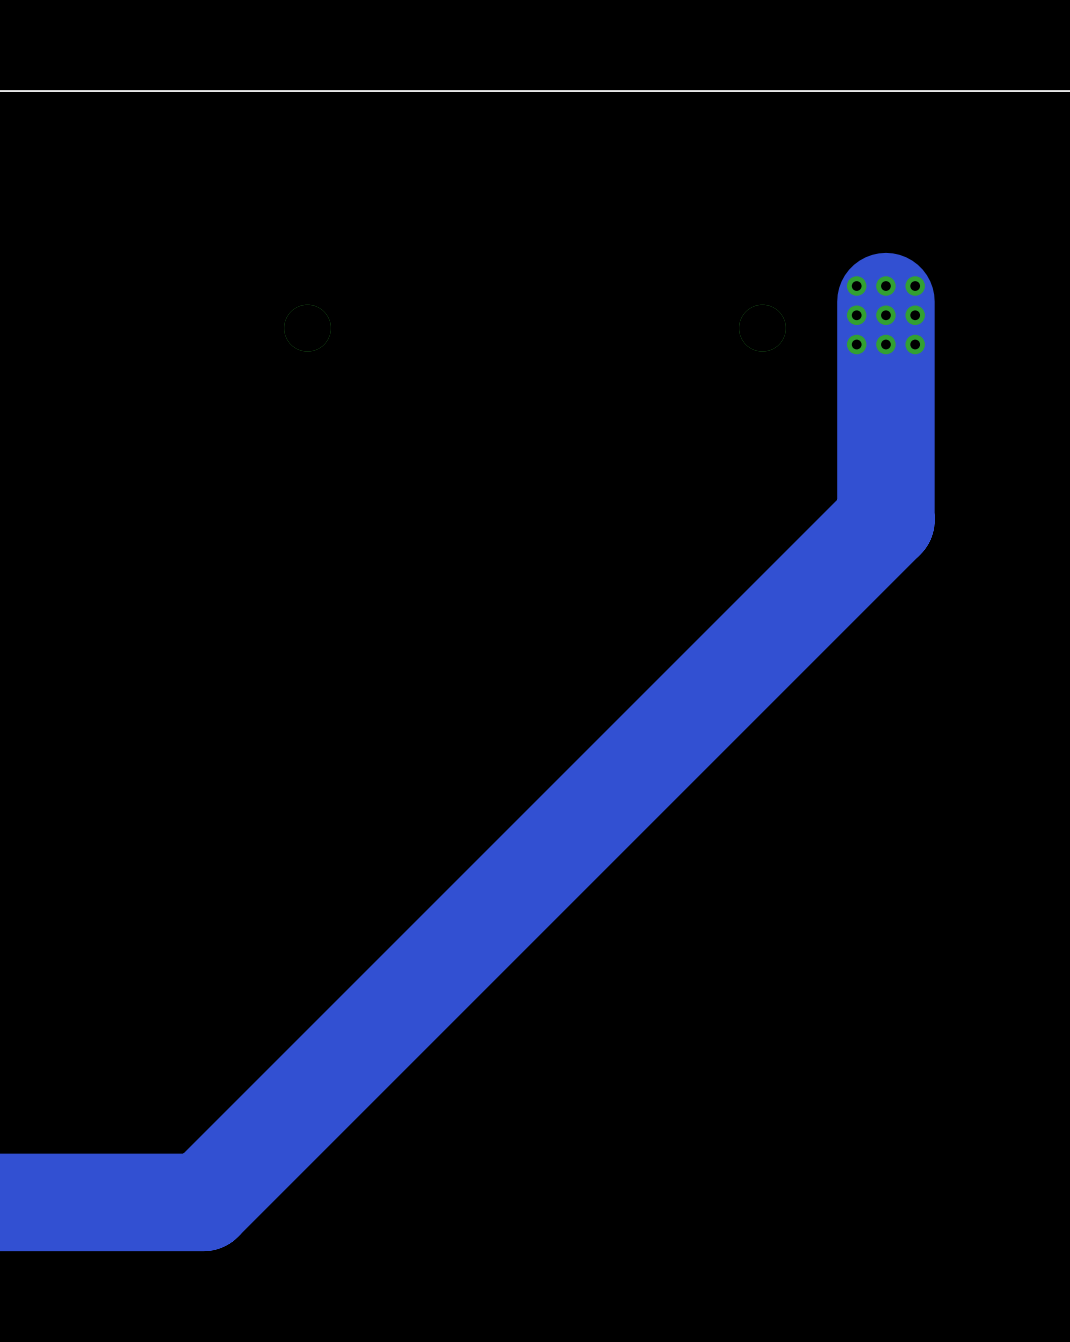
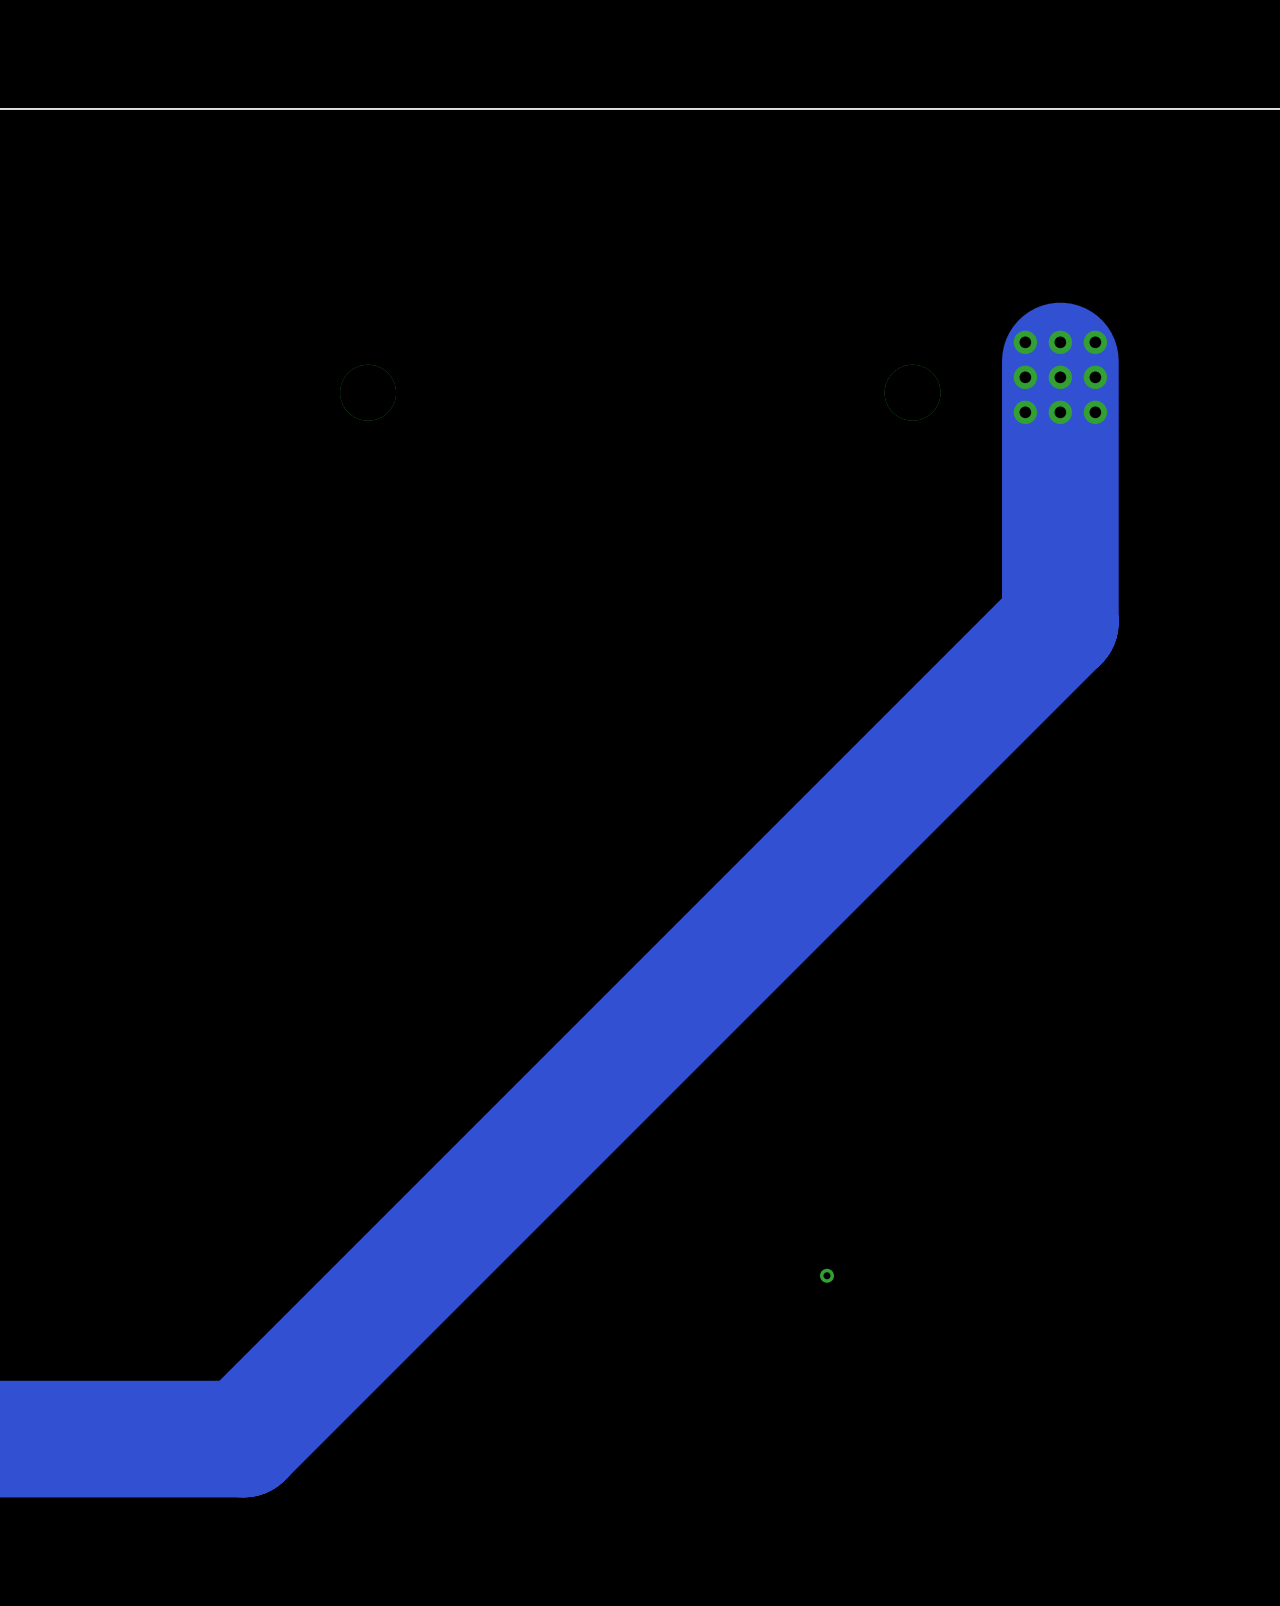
via: none -> (827, 1275)

